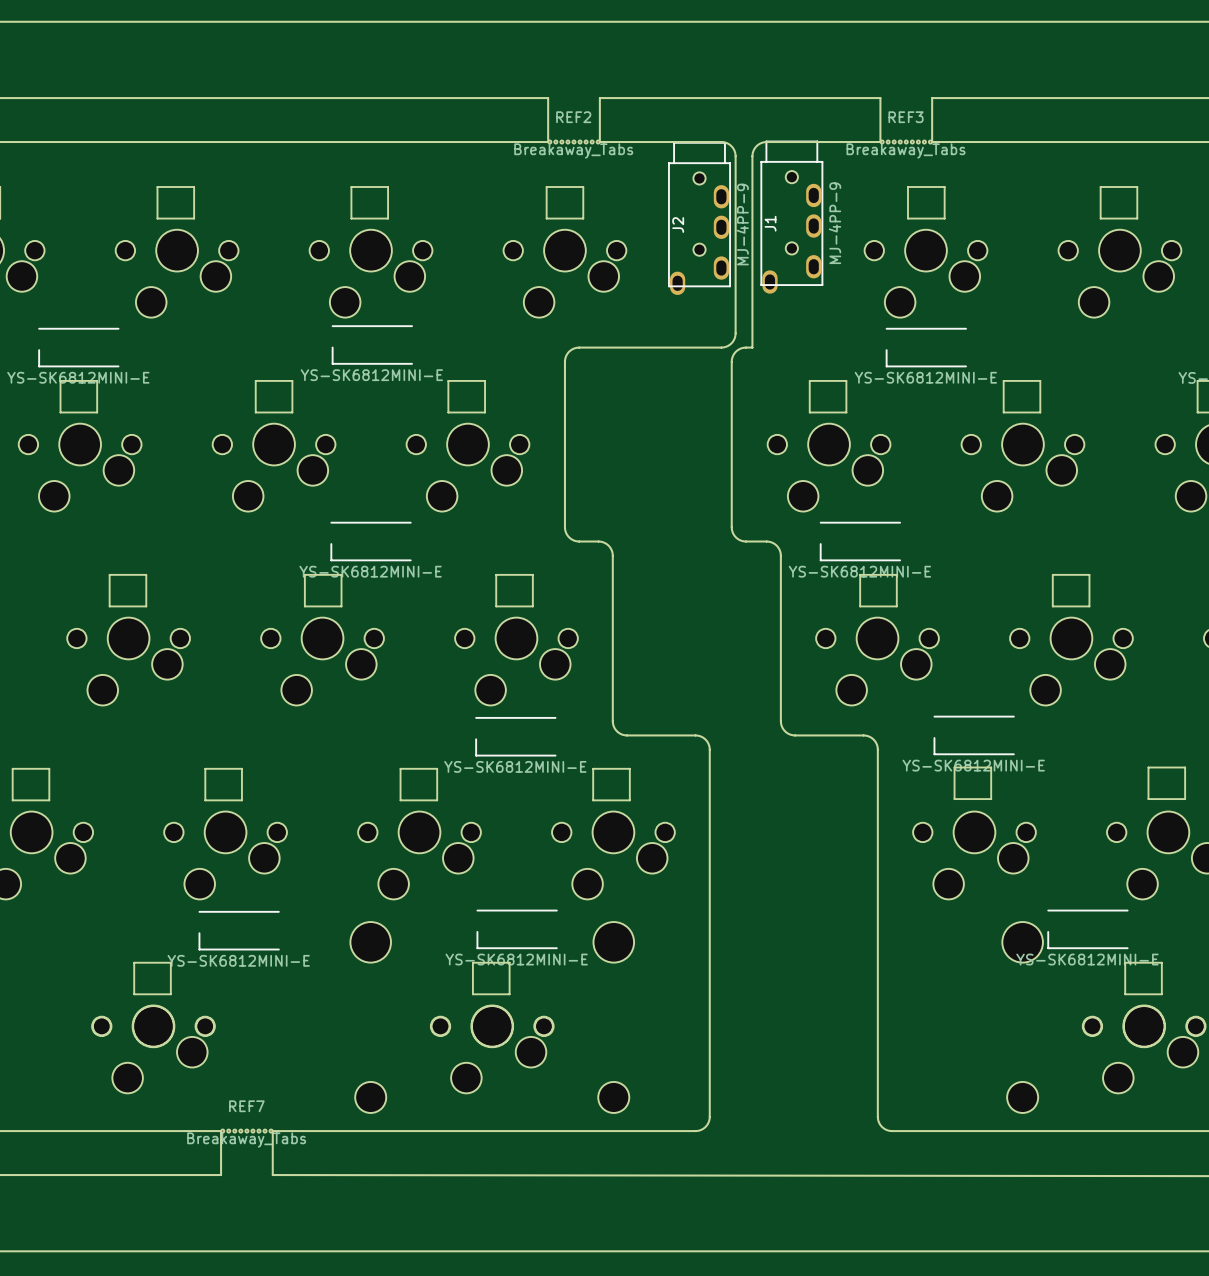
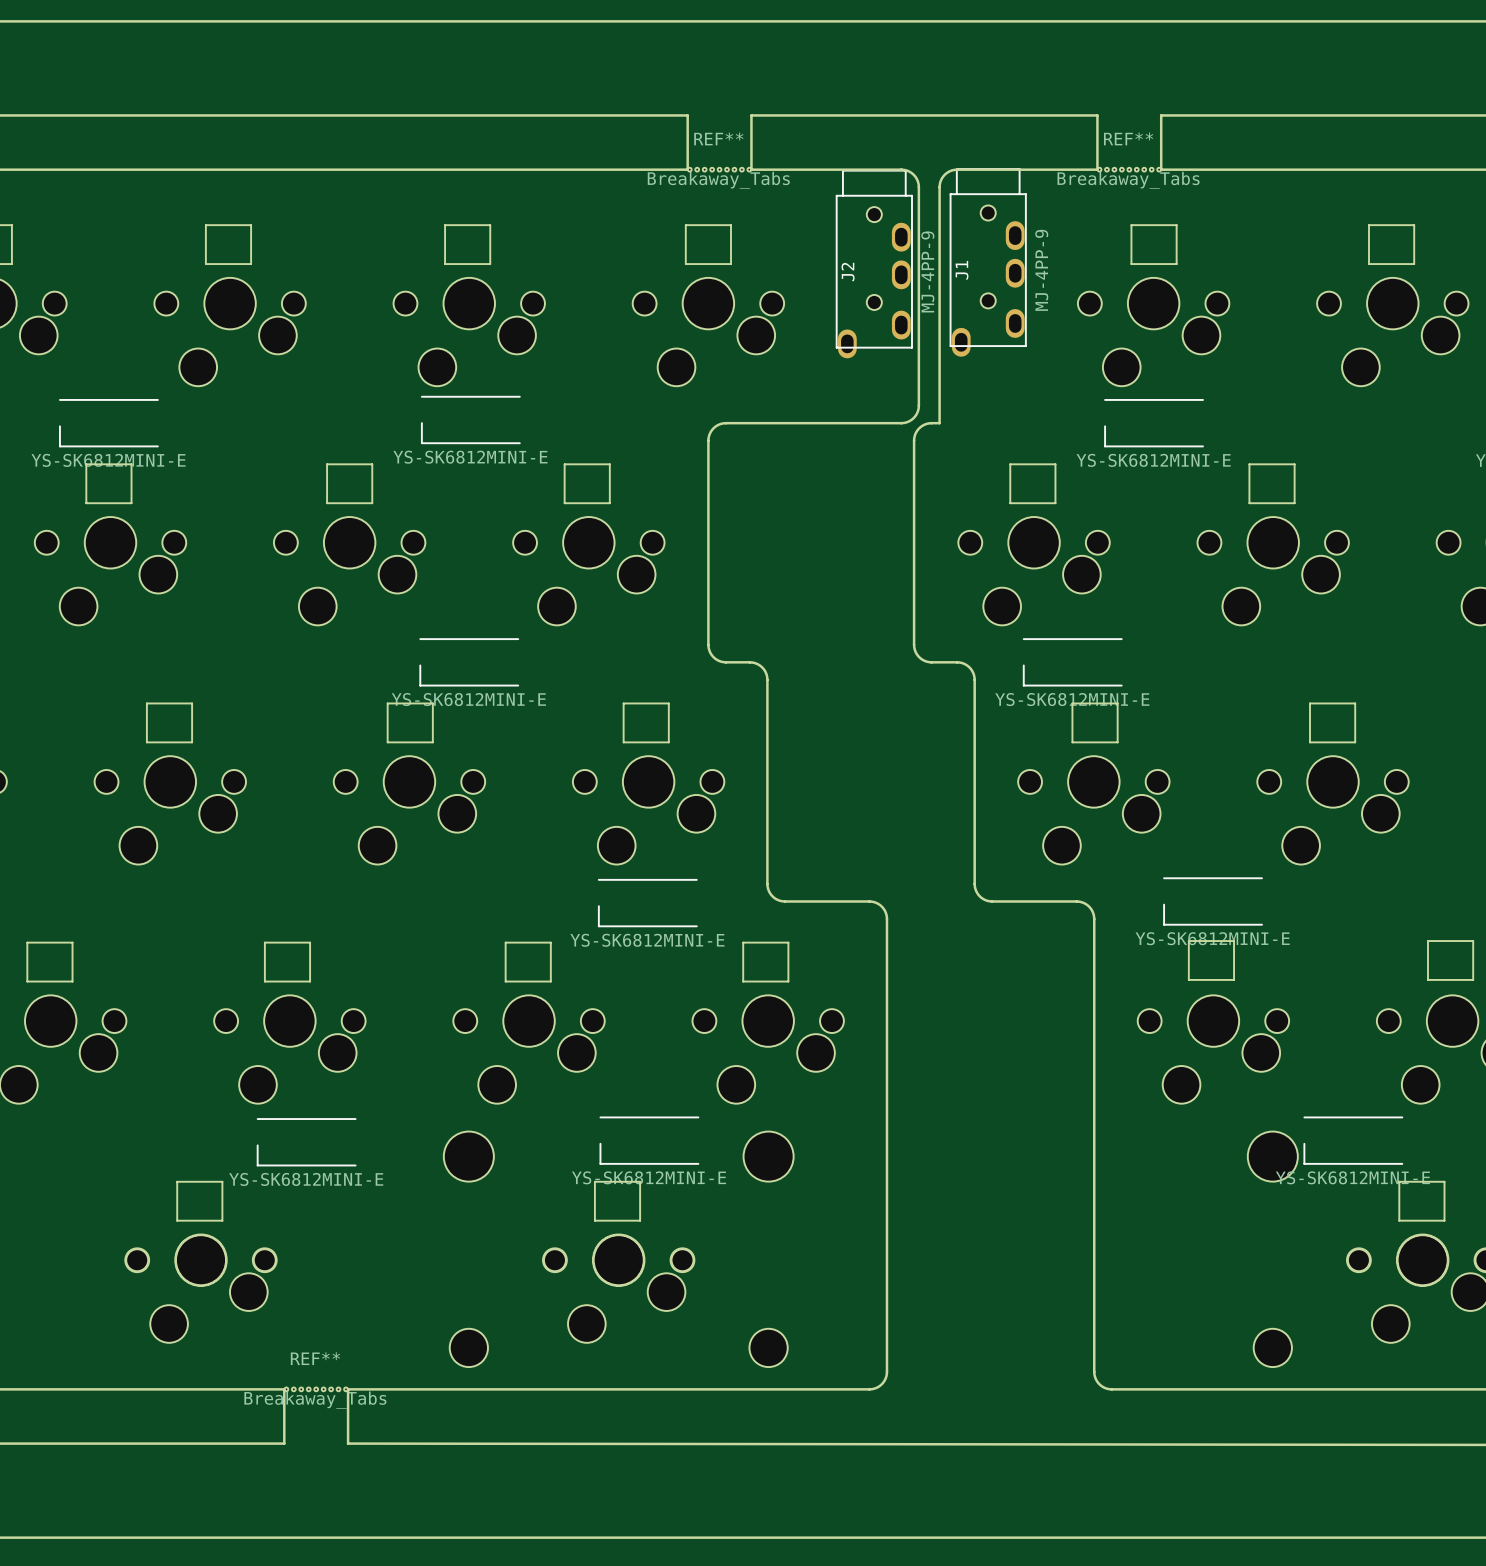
REF2 name: REF2 (573, 117) -> REF** (718, 138)
REF3 name: REF3 (906, 117) -> REF** (1128, 138)
REF7 name: REF7 (246, 1106) -> REF** (315, 1358)

